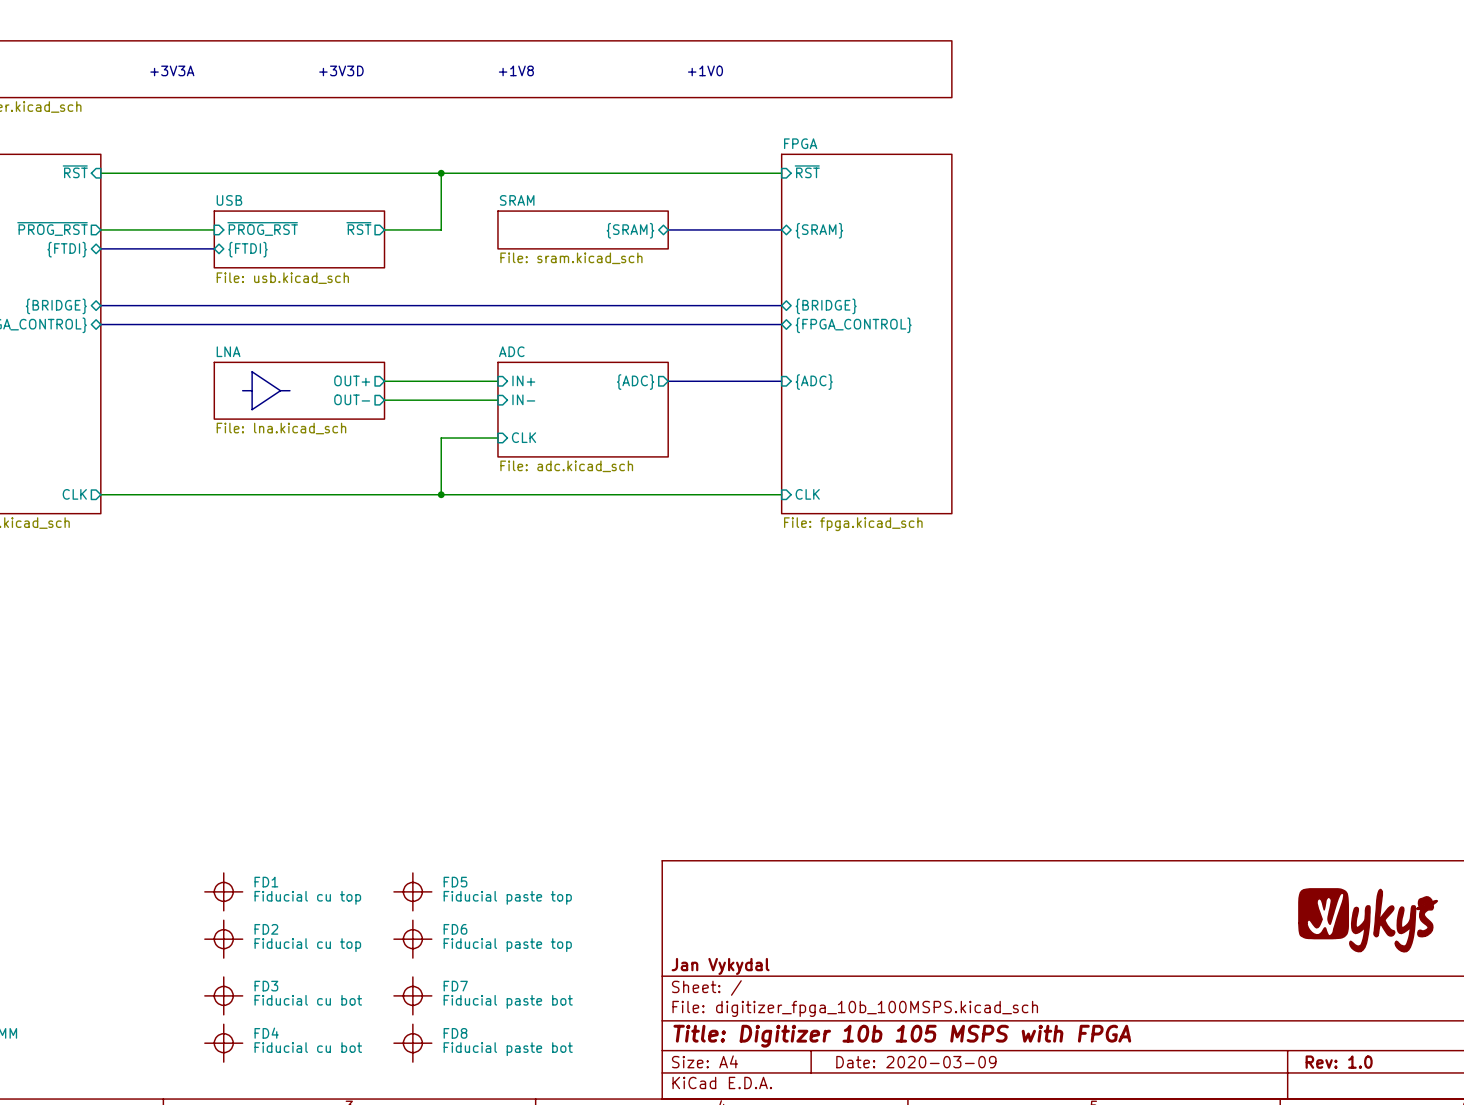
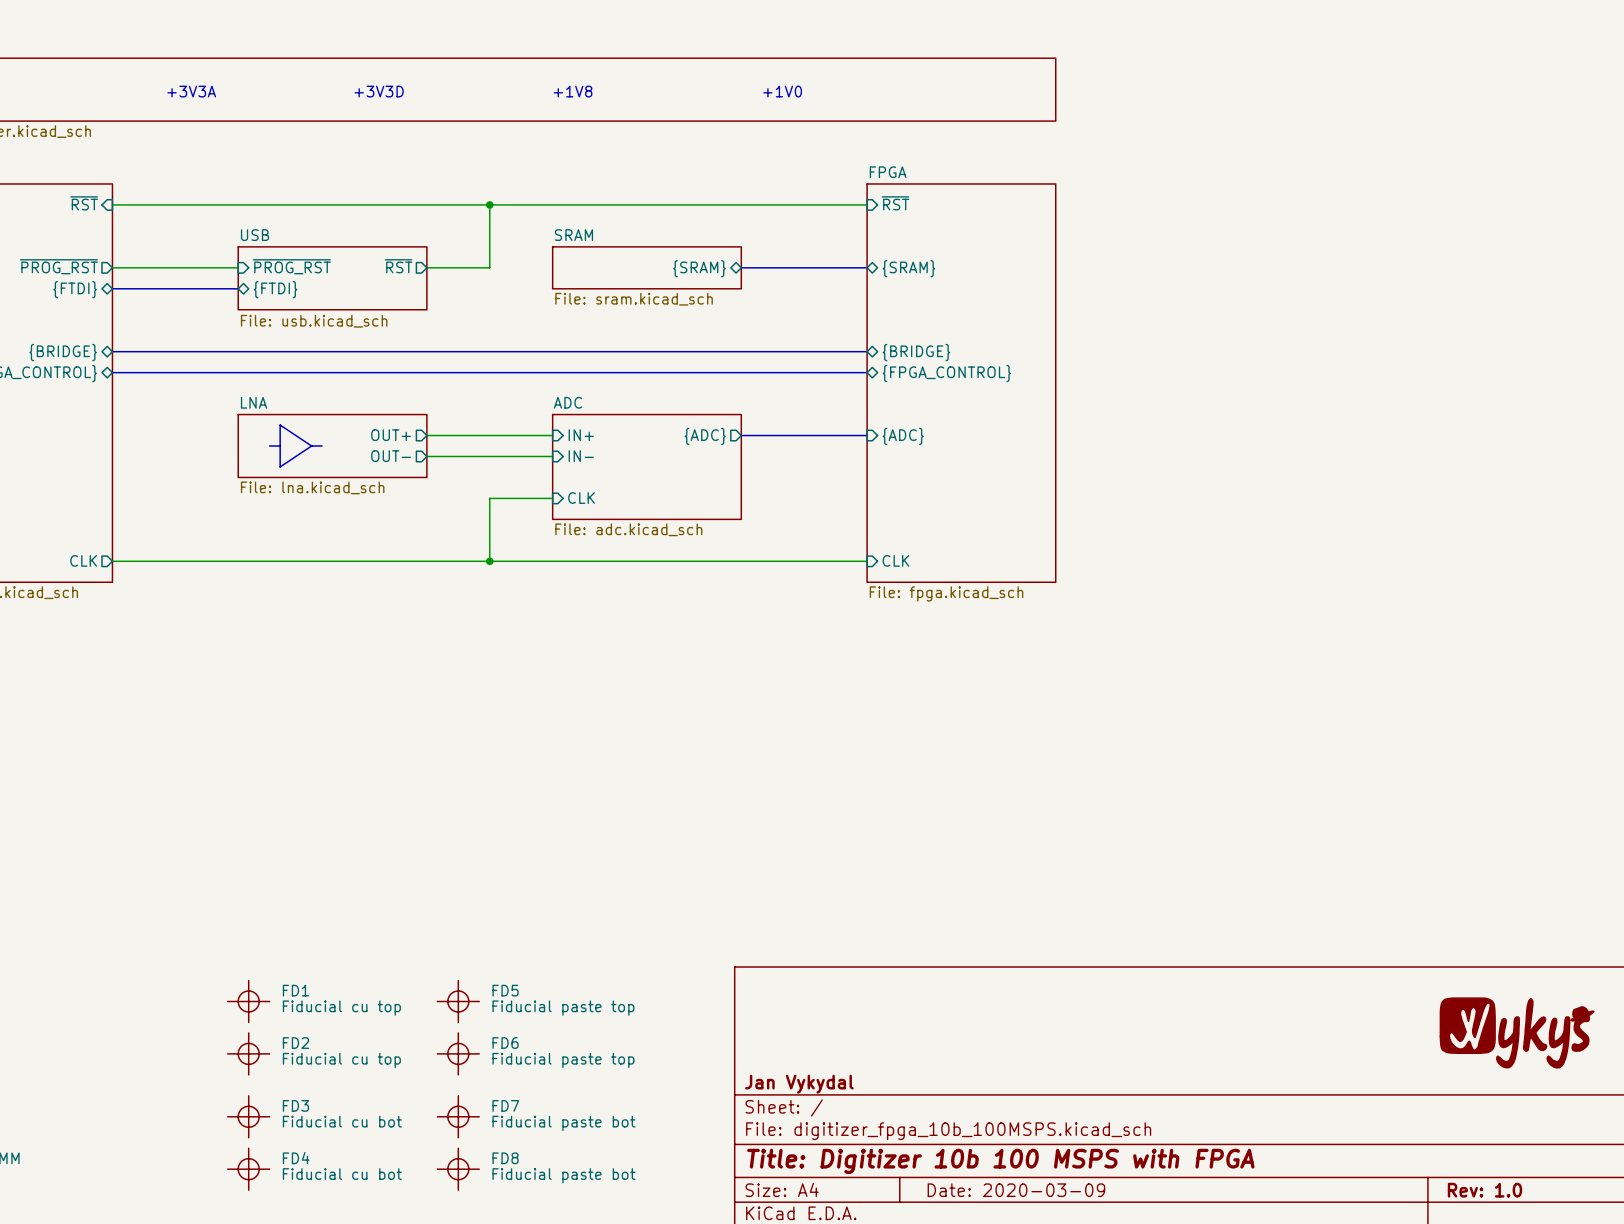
title block: Title: Digitizer 10b 105 MSPS with FPGA (902, 1036) -> Title: Digitizer 10b 100 MSPS with FPGA (1000, 1161)

